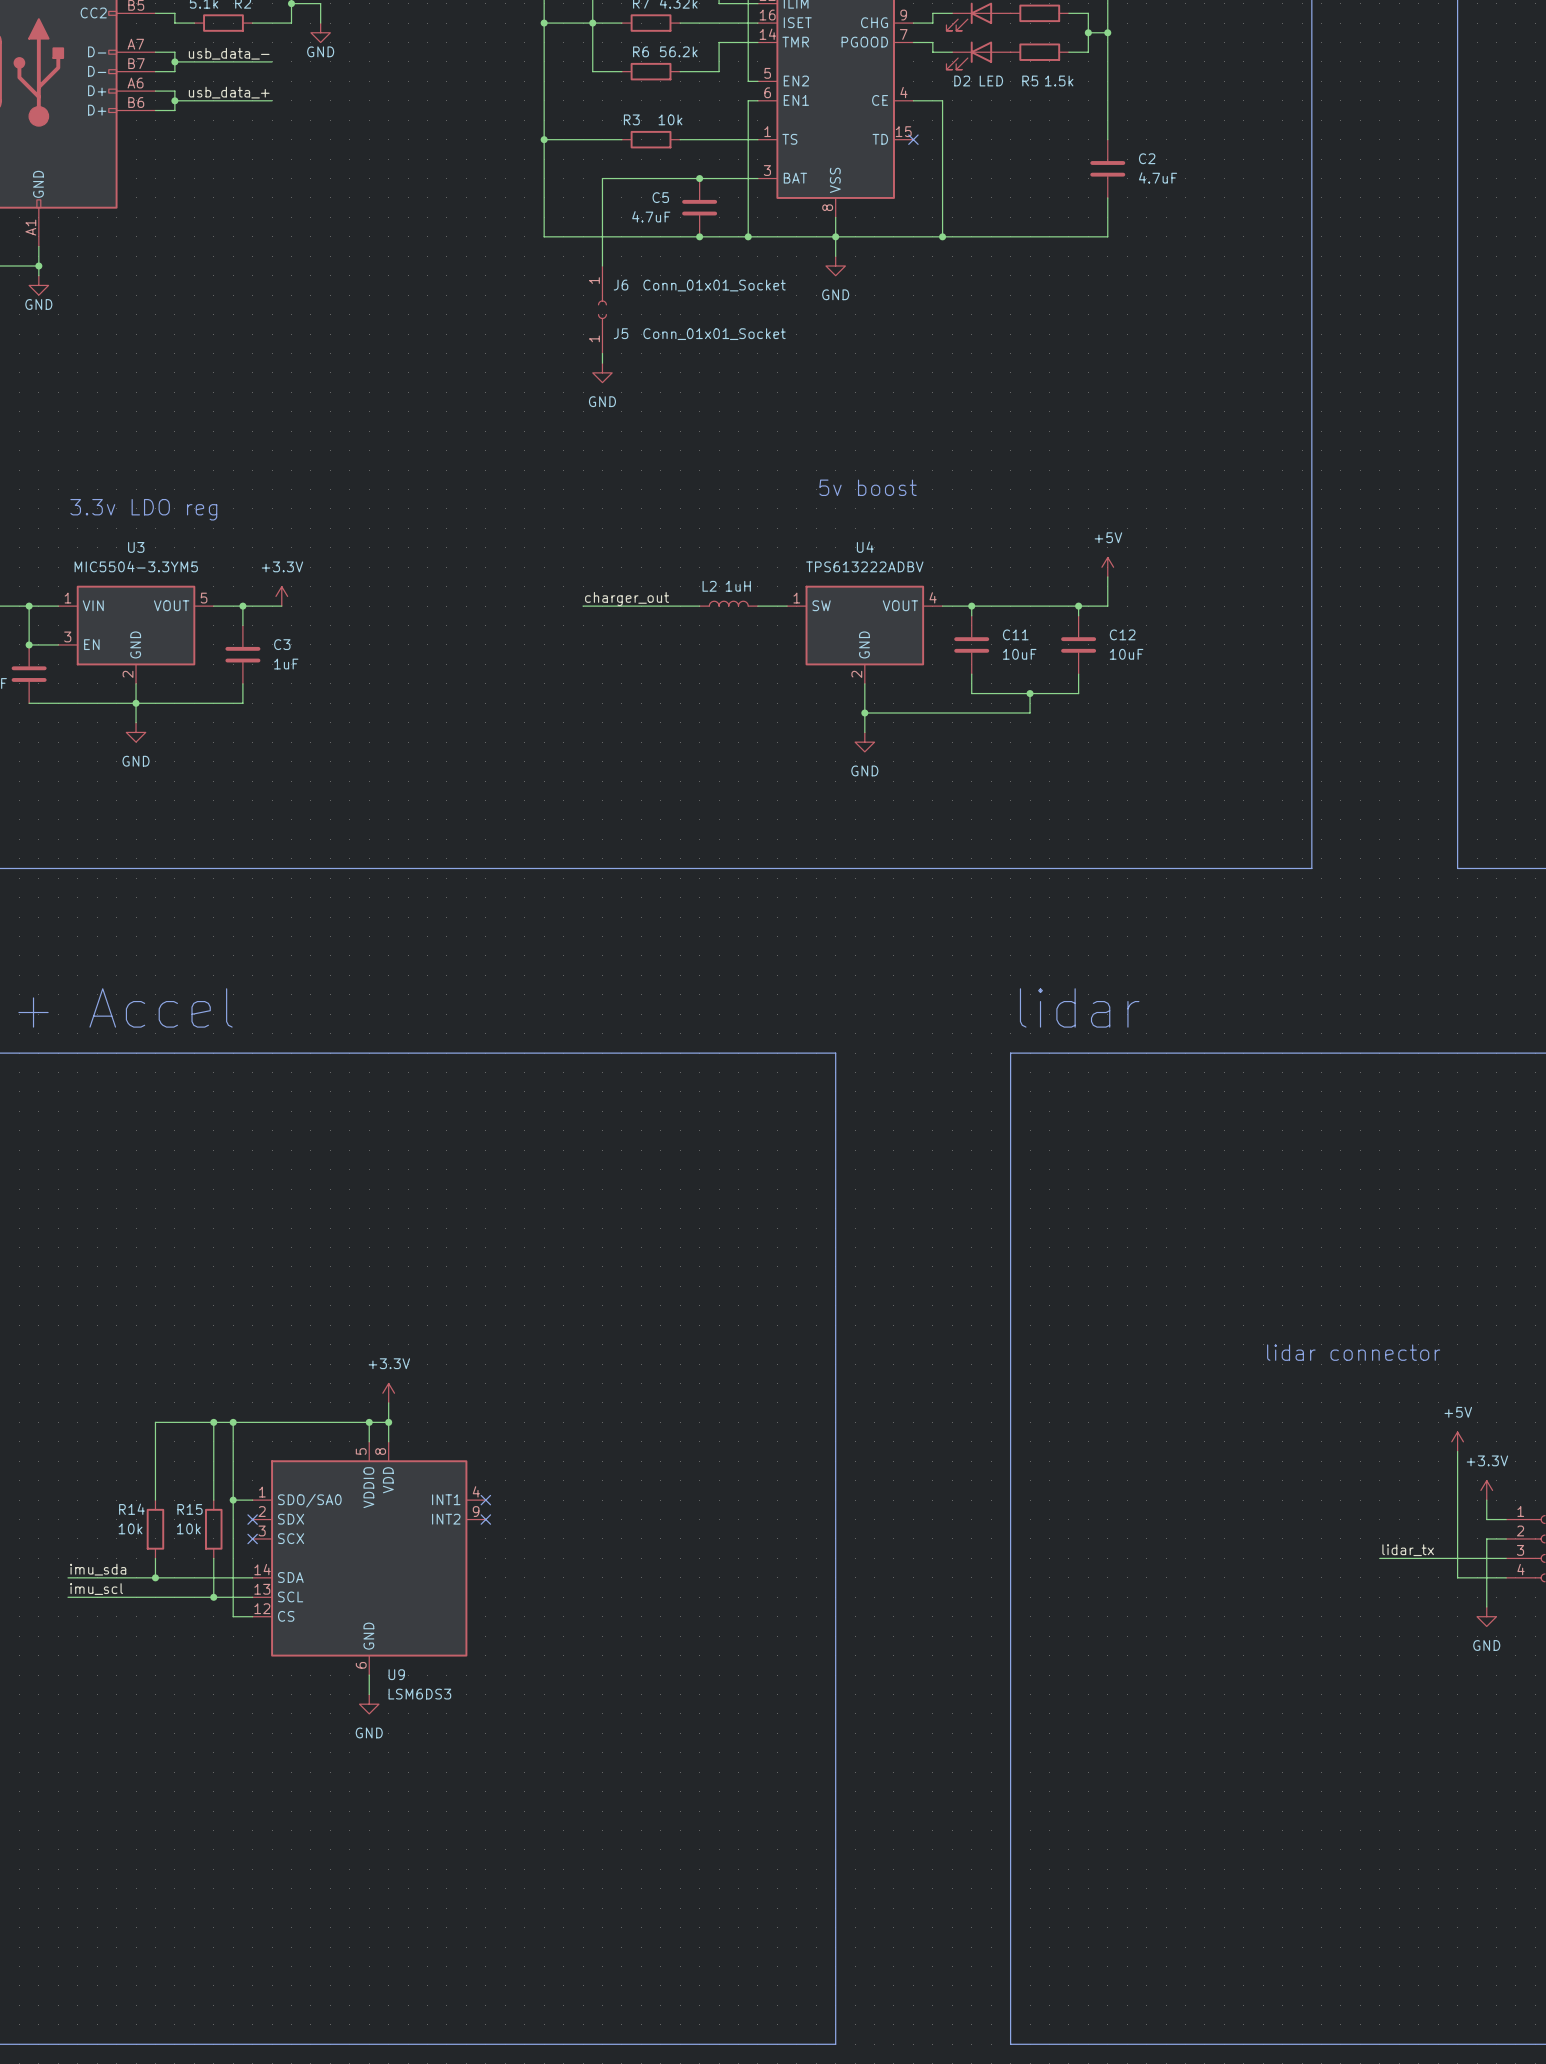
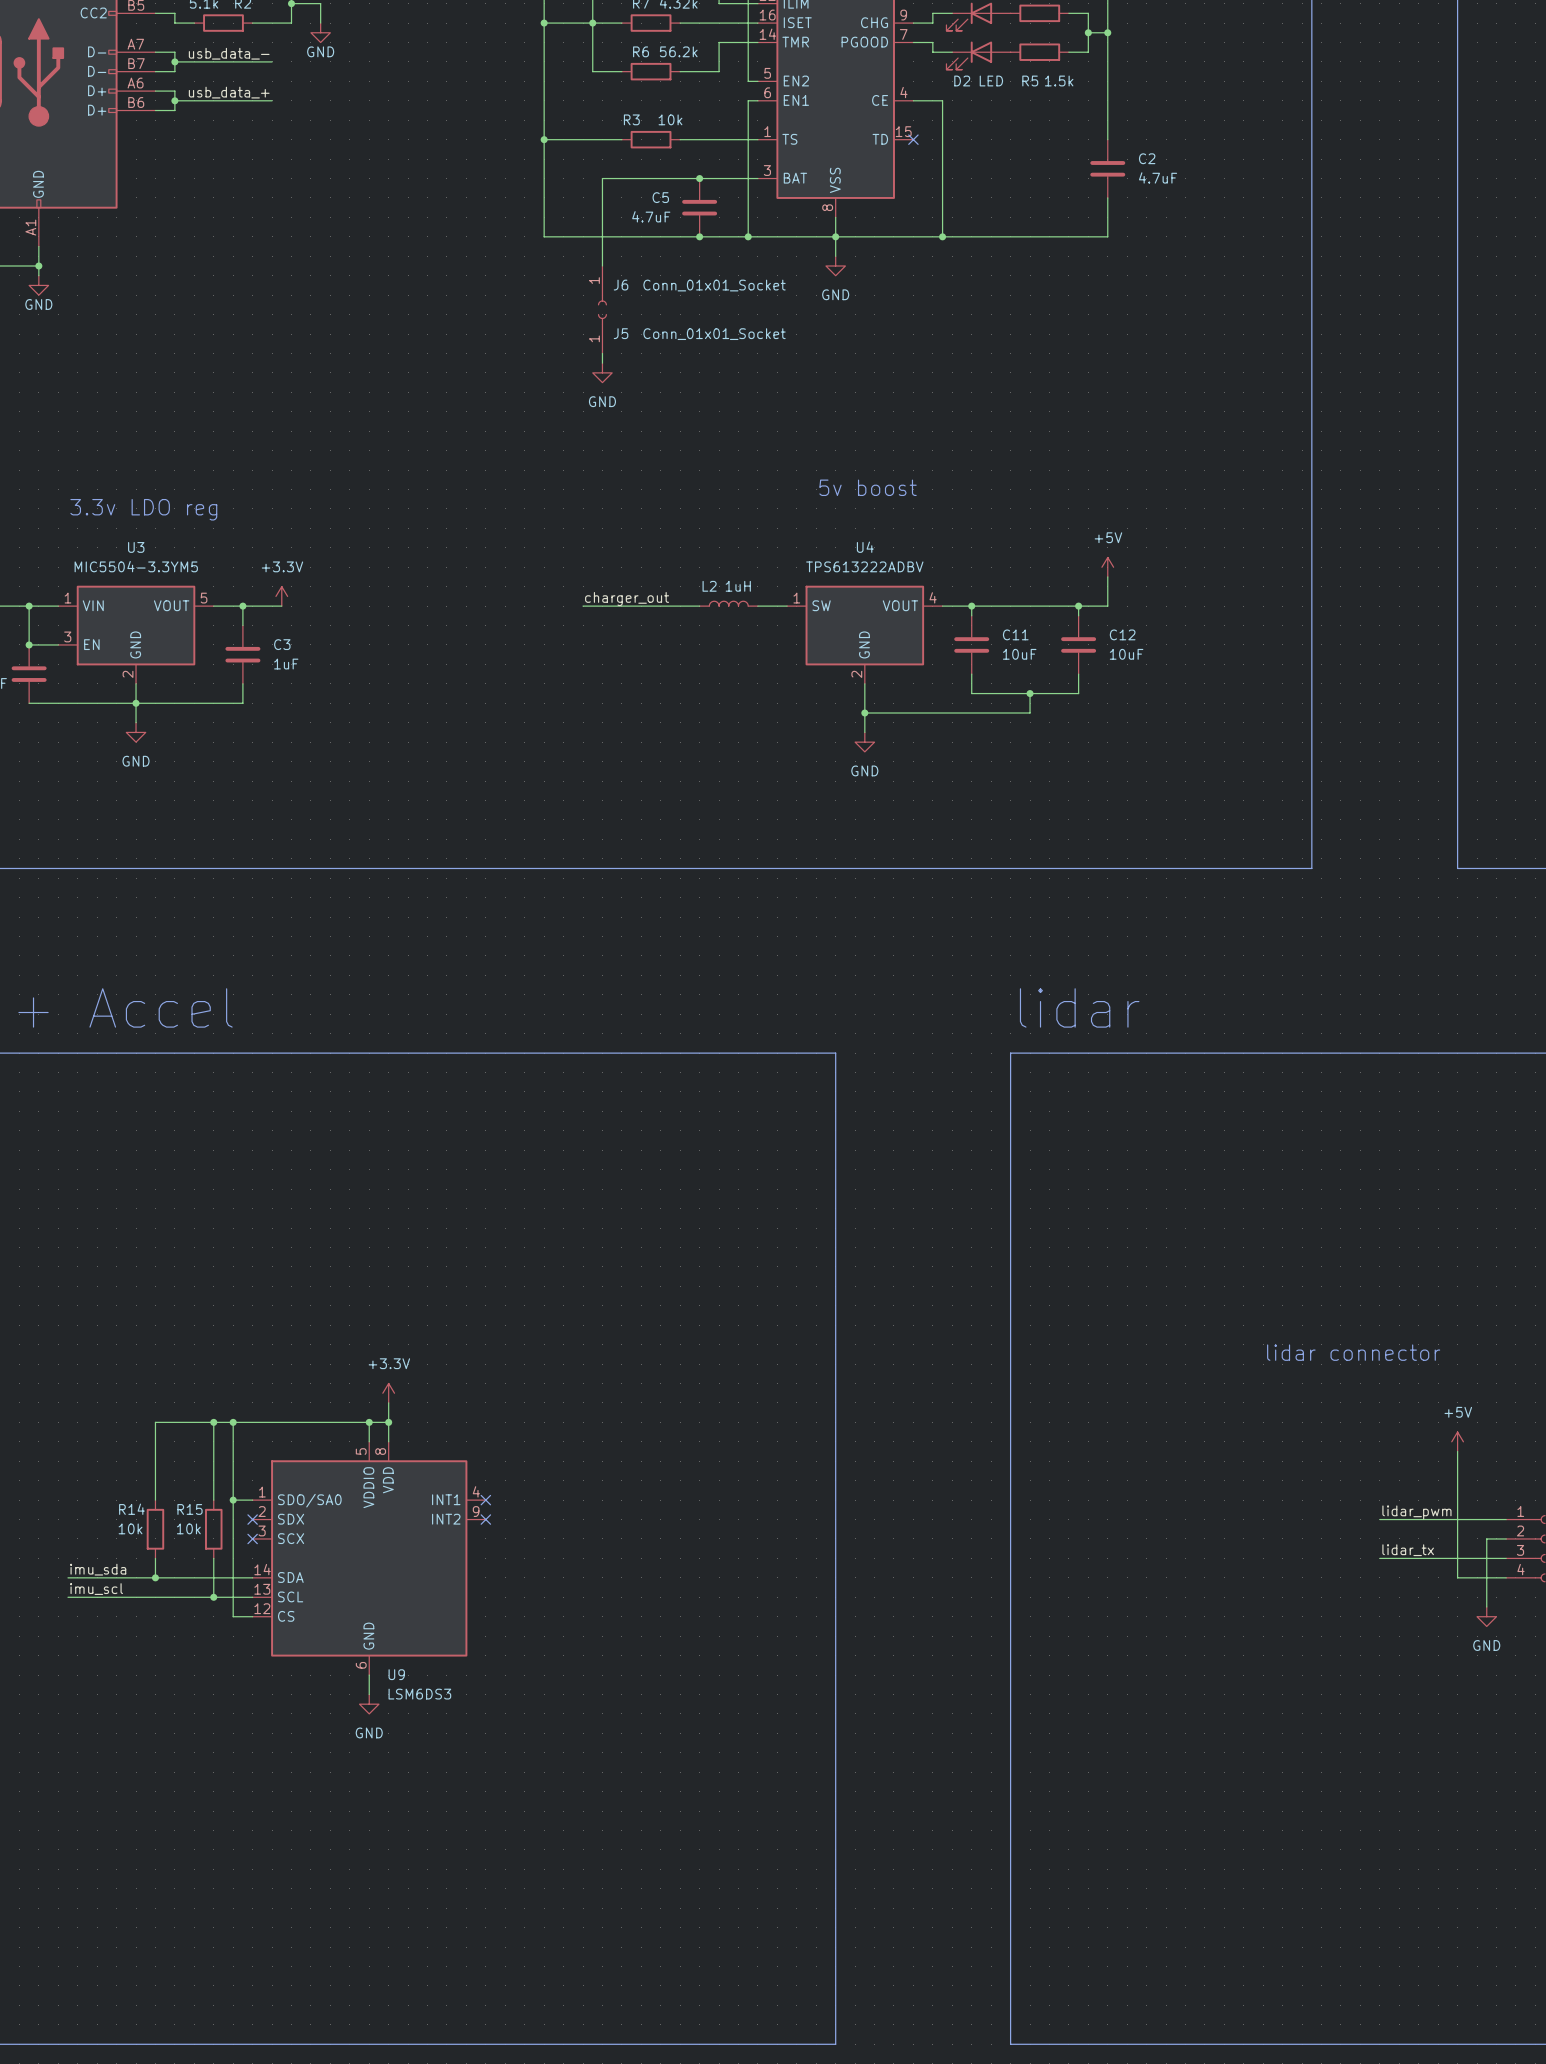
power symbol: +3.3V (1486, 1490) -> none
wire: (1486, 1500) (1486, 1519) -> (1379, 1519) (1486, 1519)
label: none -> lidar_pwm (1416, 1512)

